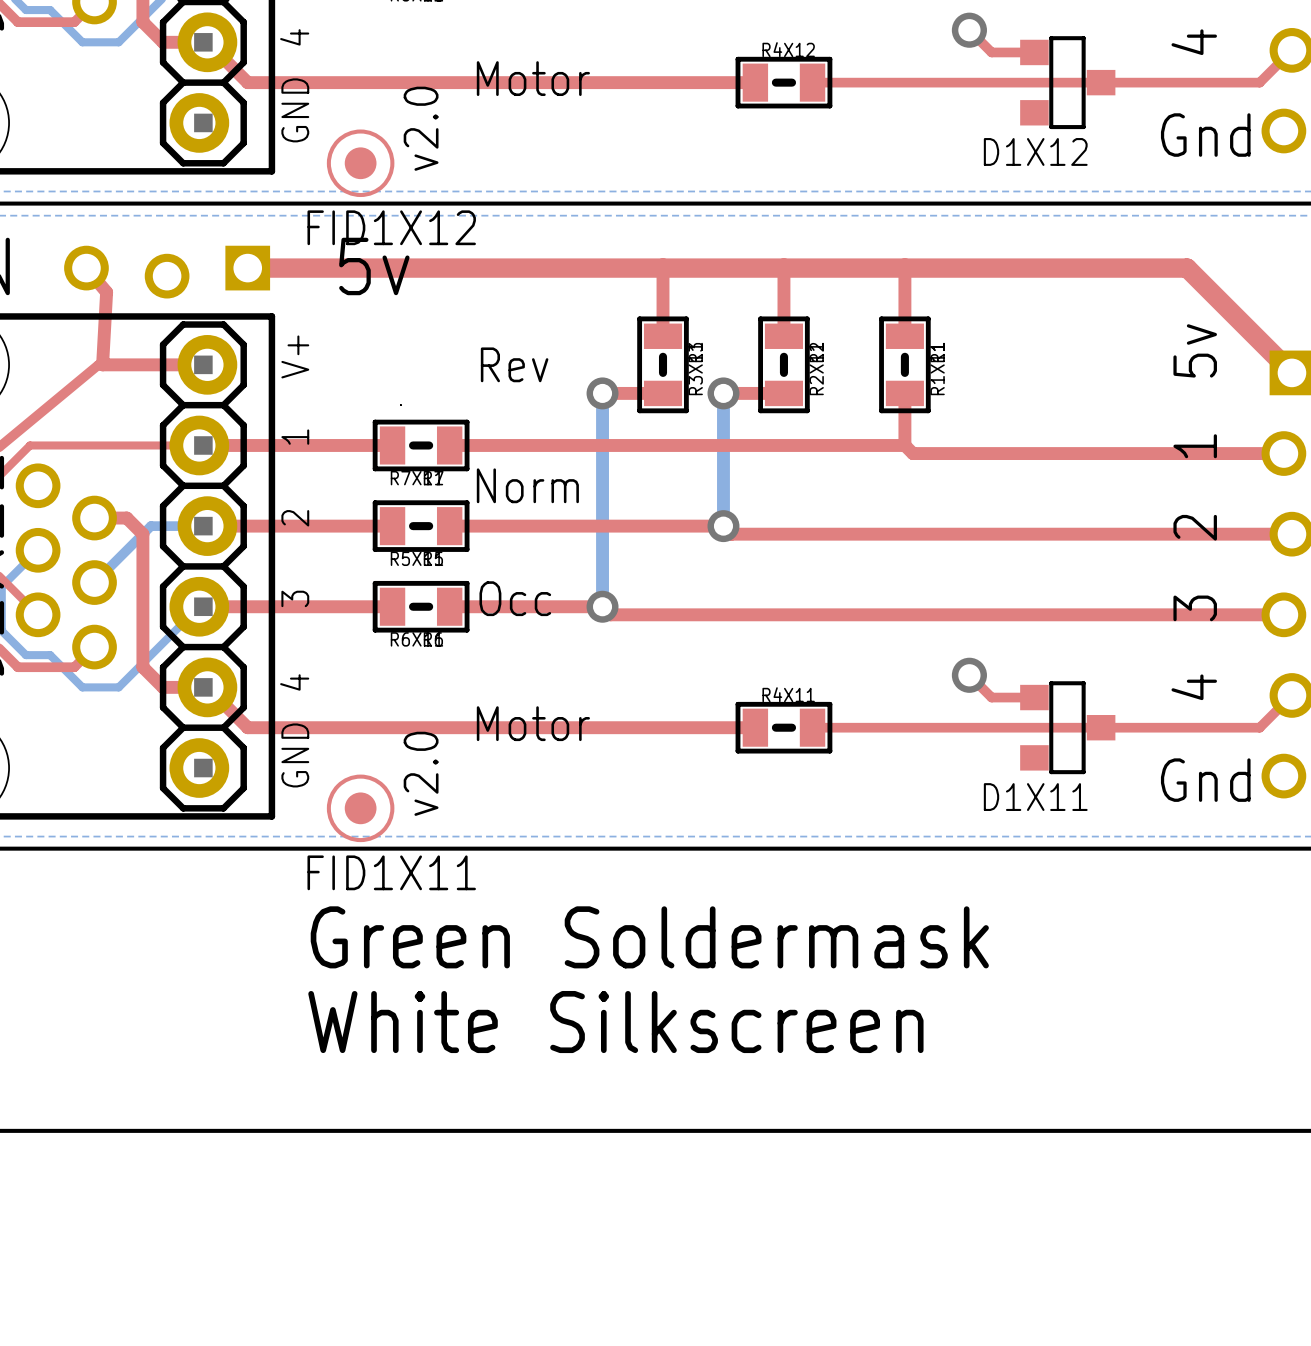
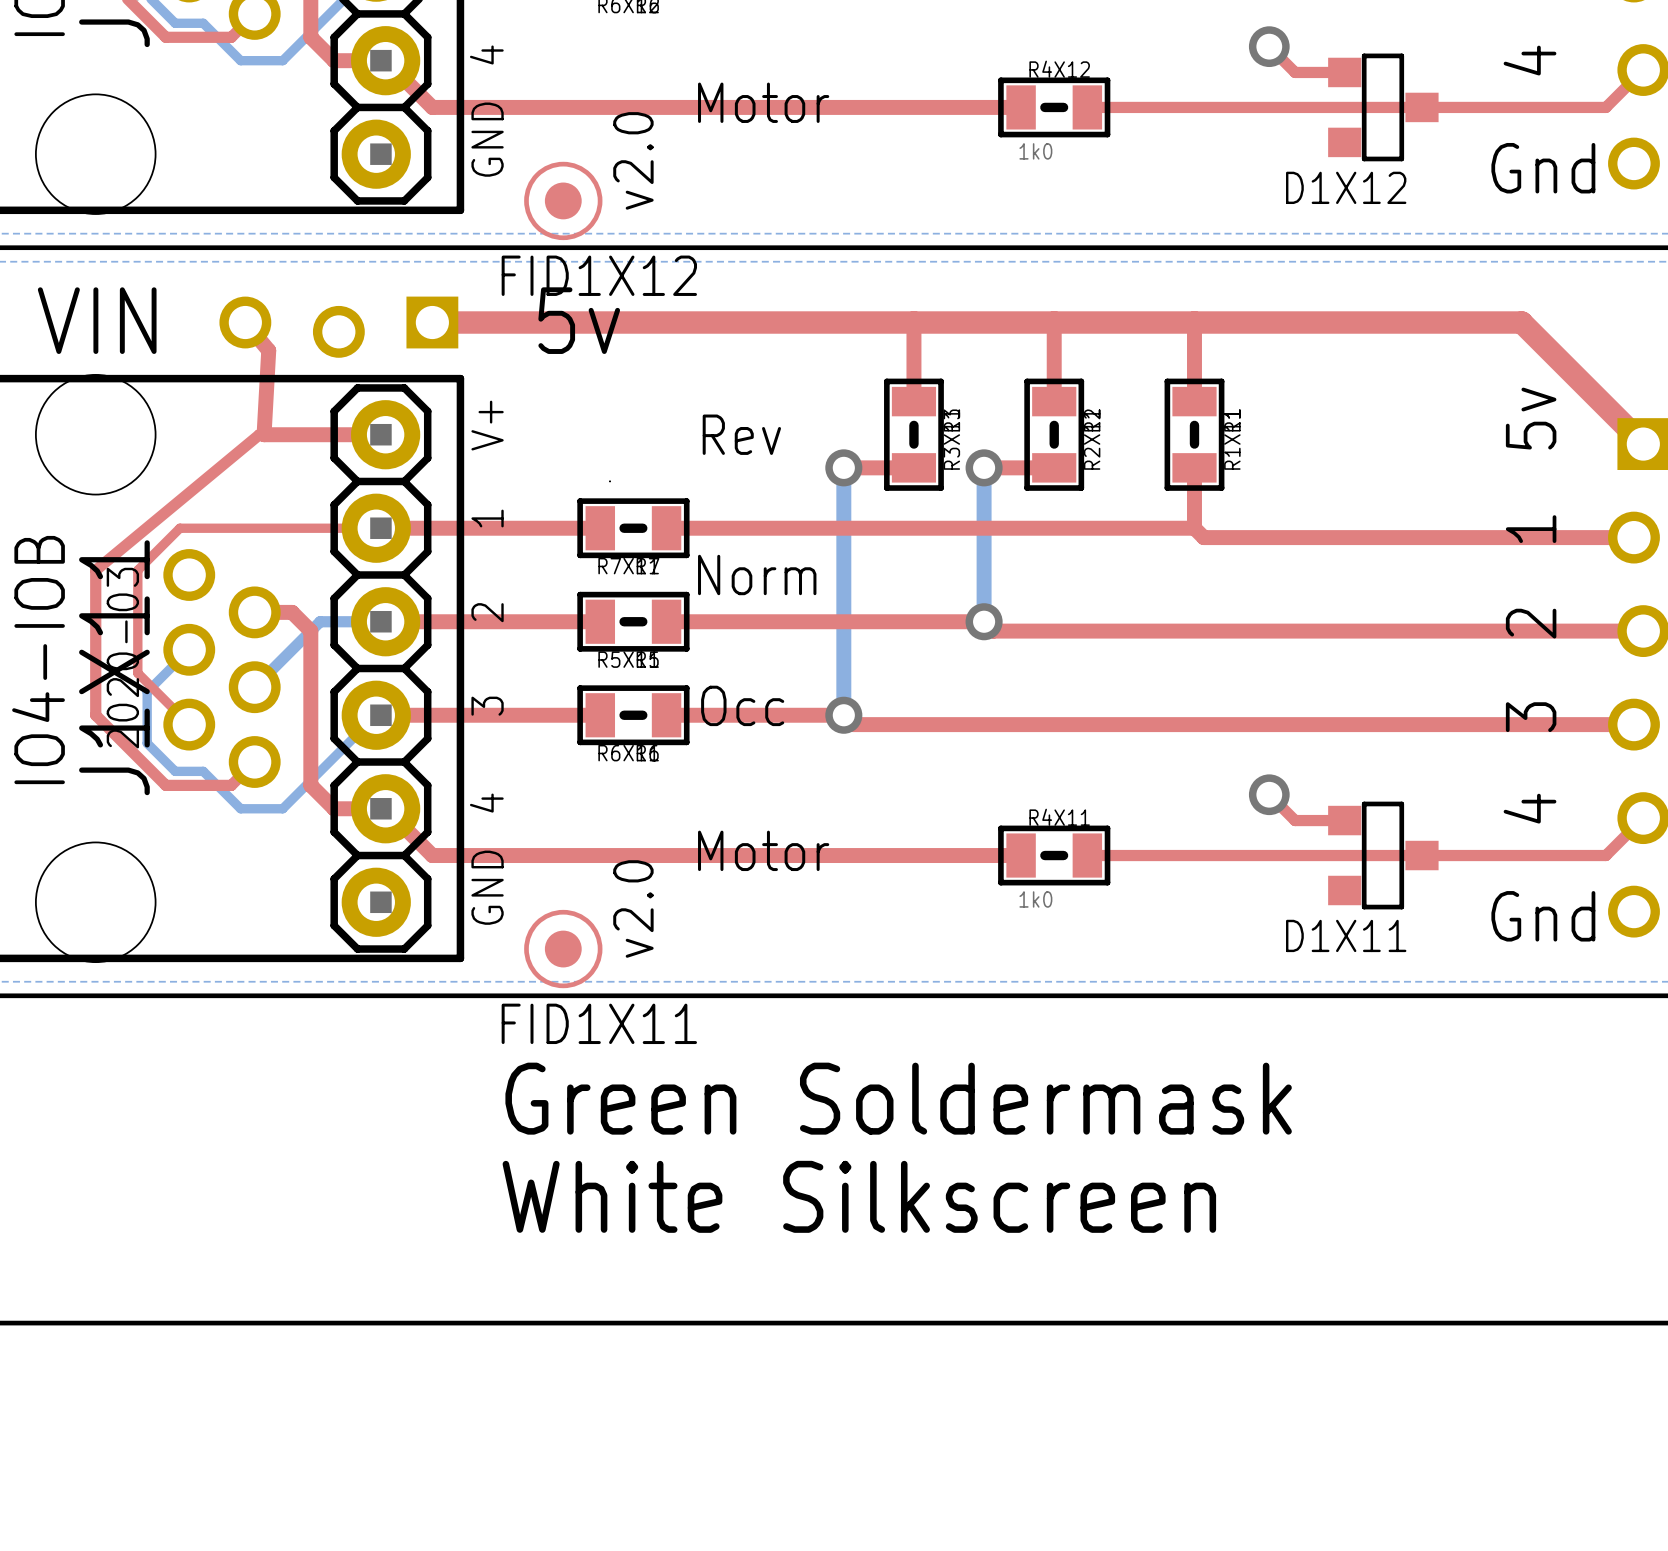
R4X12 value: none -> 1k0 (1035, 151)
R4X11 value: none -> 1k0 (1035, 899)

